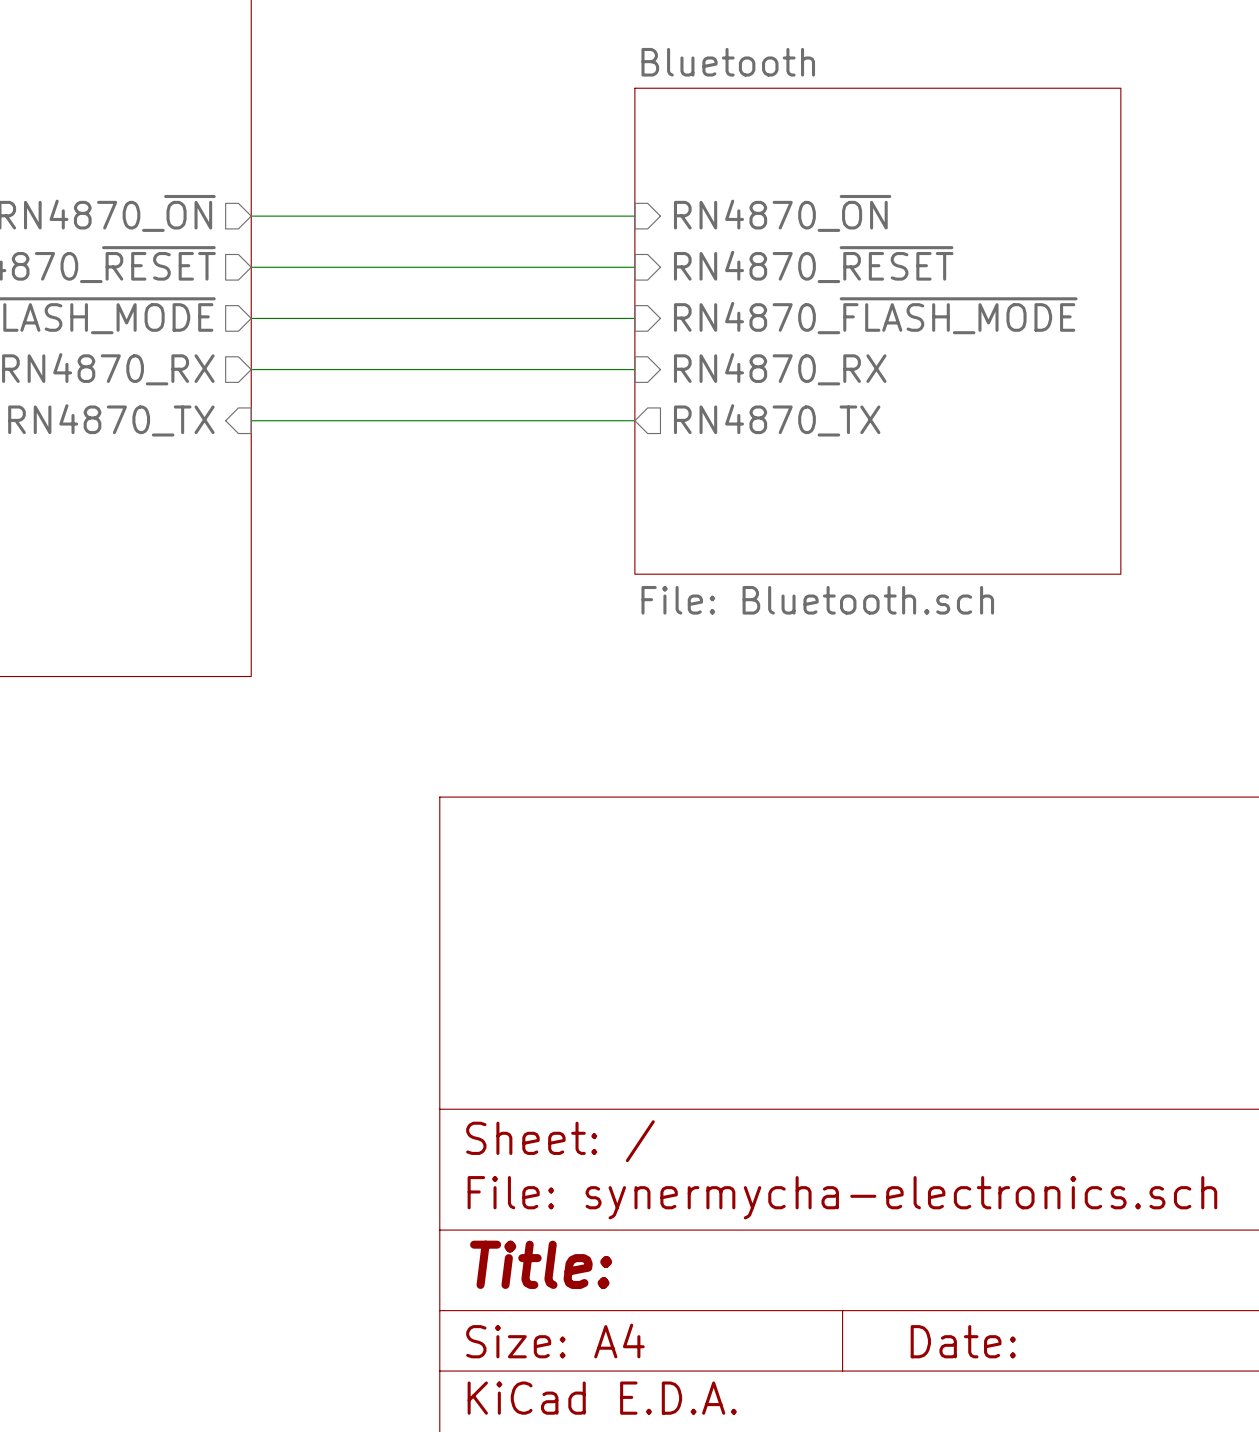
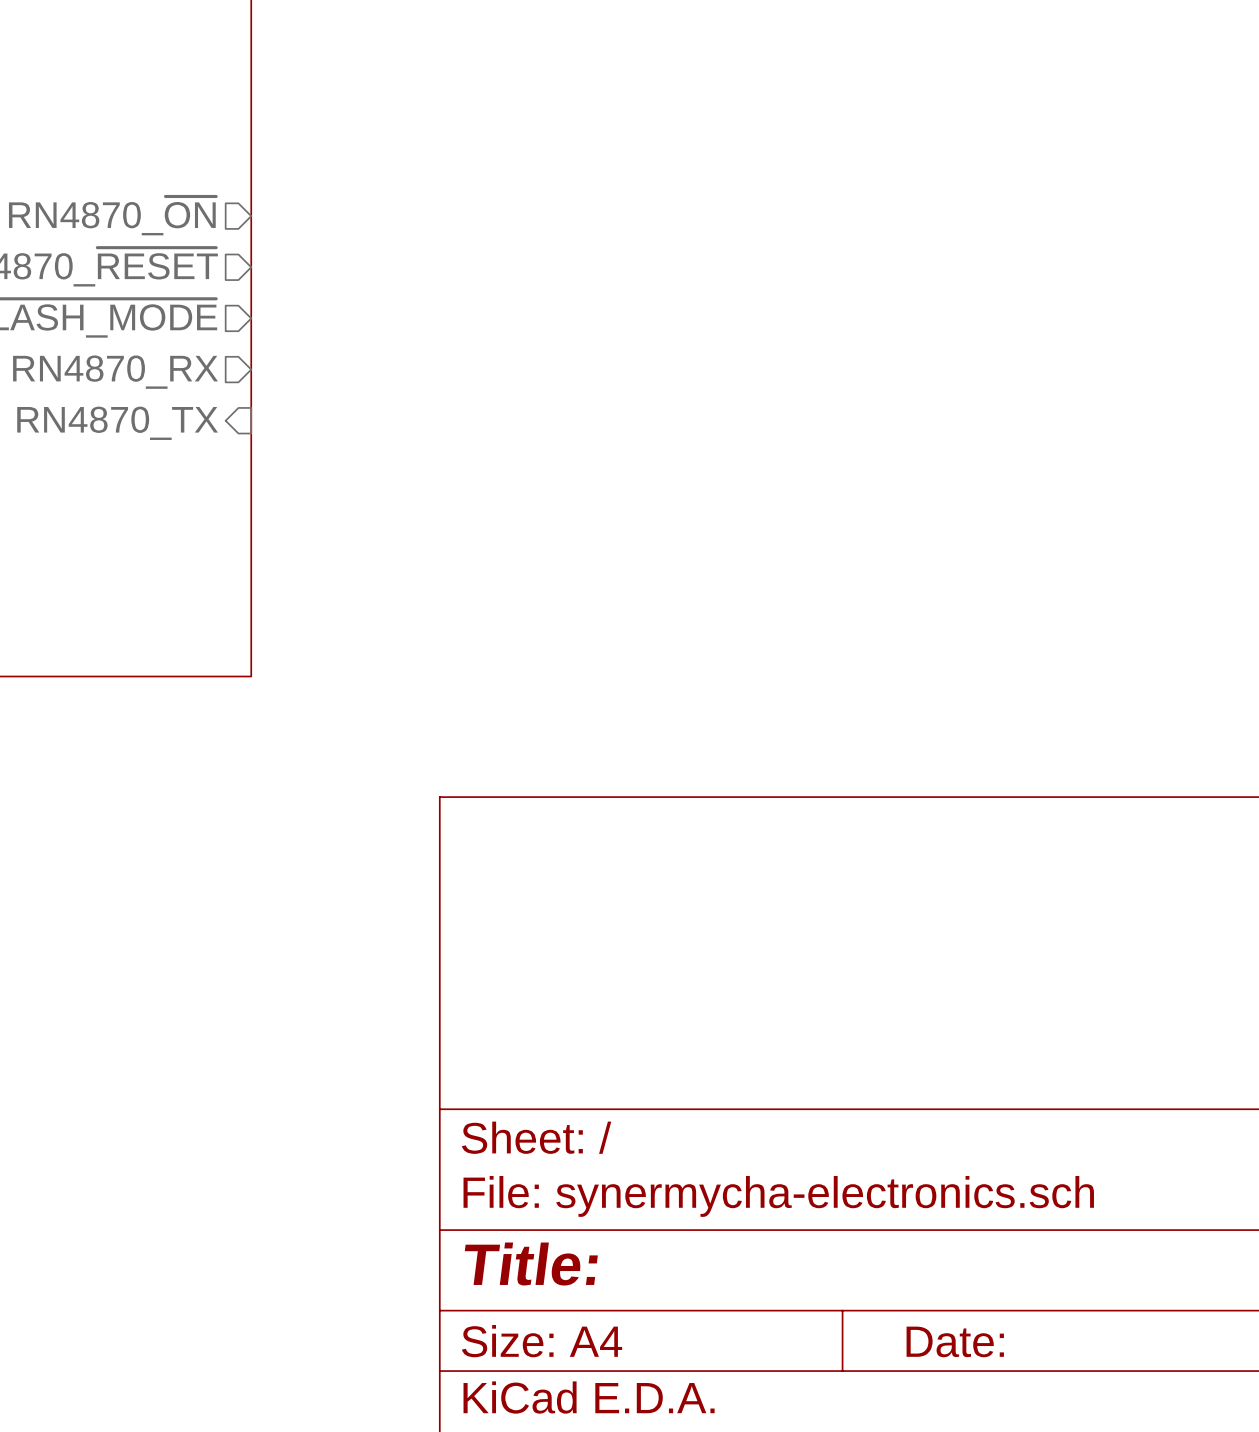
sheet pin: RN4870_~{ON} (782, 213) -> none
wire: (251, 216) (634, 216) -> none
sheet pin: RN4870_~{RESET} (813, 264) -> none
wire: (251, 267) (634, 267) -> none
sheet pin: RN4870_~{FLASH_MODE} (875, 315) -> none
wire: (251, 318) (634, 318) -> none
sheet Bluetooth: File: Bluetooth.sch (877, 331) -> none
wire: (251, 369) (634, 369) -> none
sheet pin: RN4870_RX (780, 369) -> none
wire: (251, 420) (634, 420) -> none
sheet pin: RN4870_TX (777, 420) -> none

